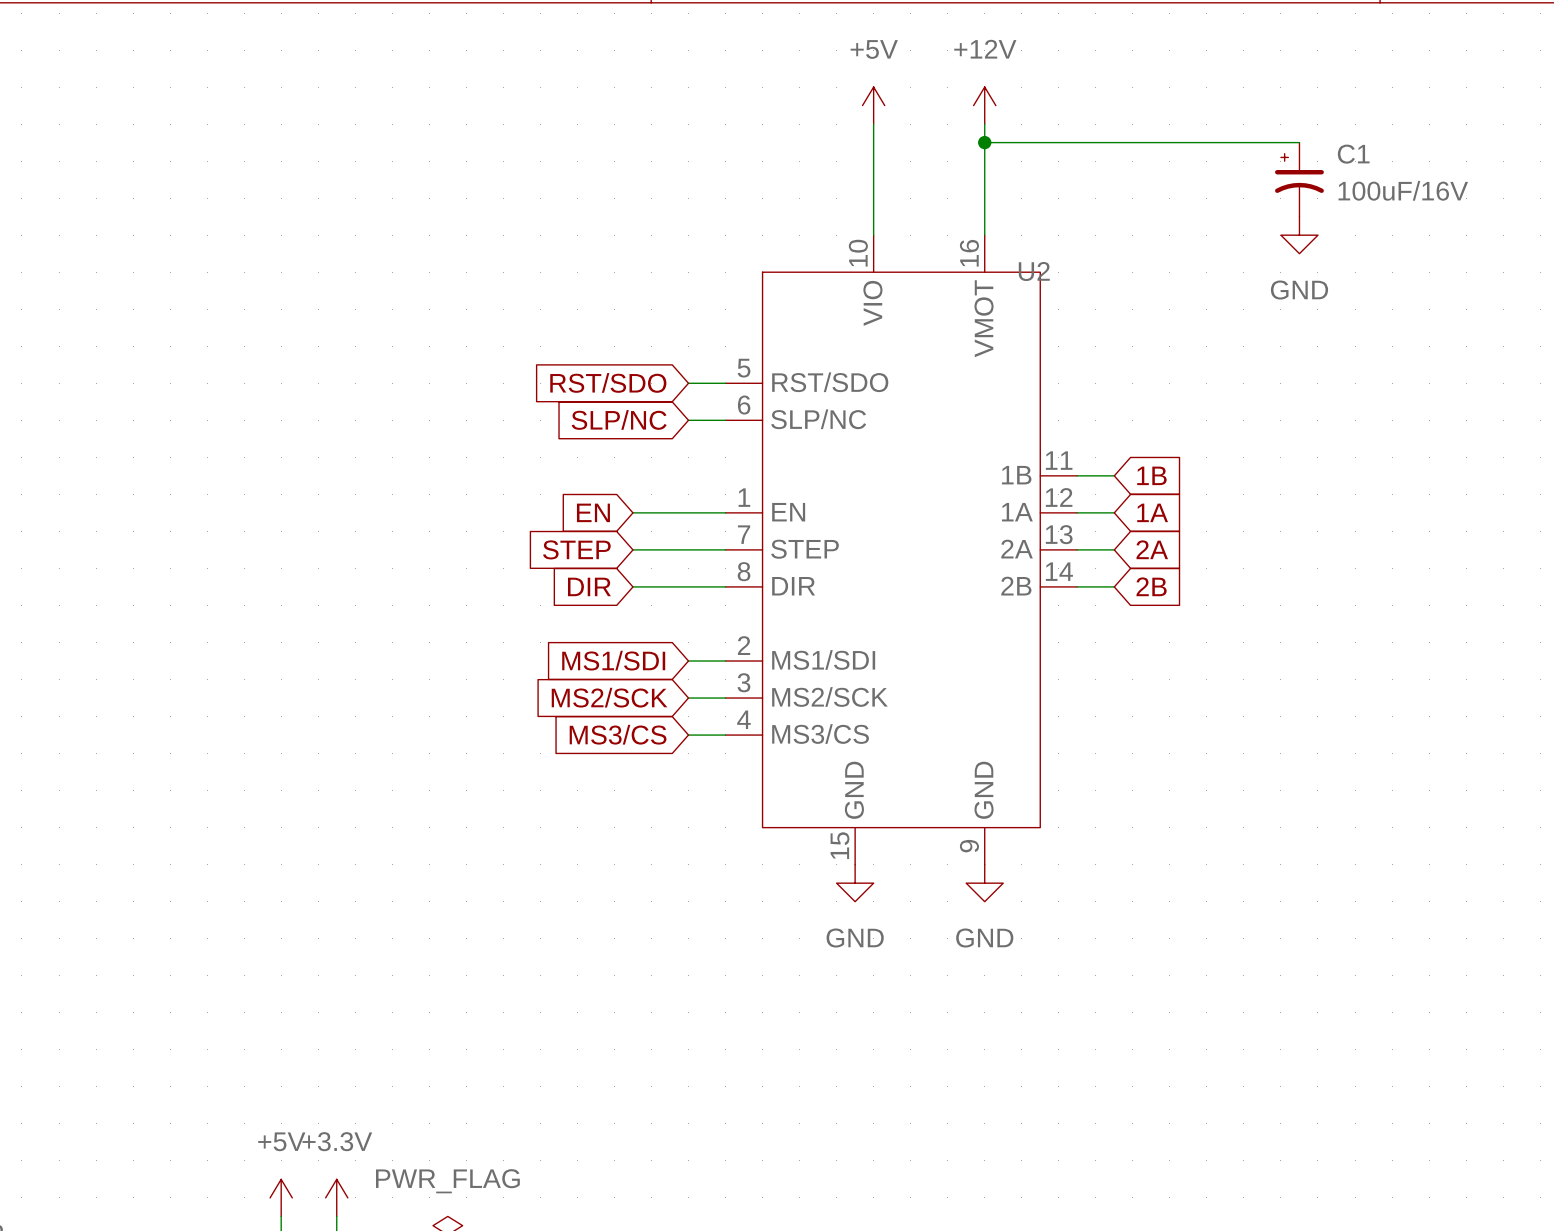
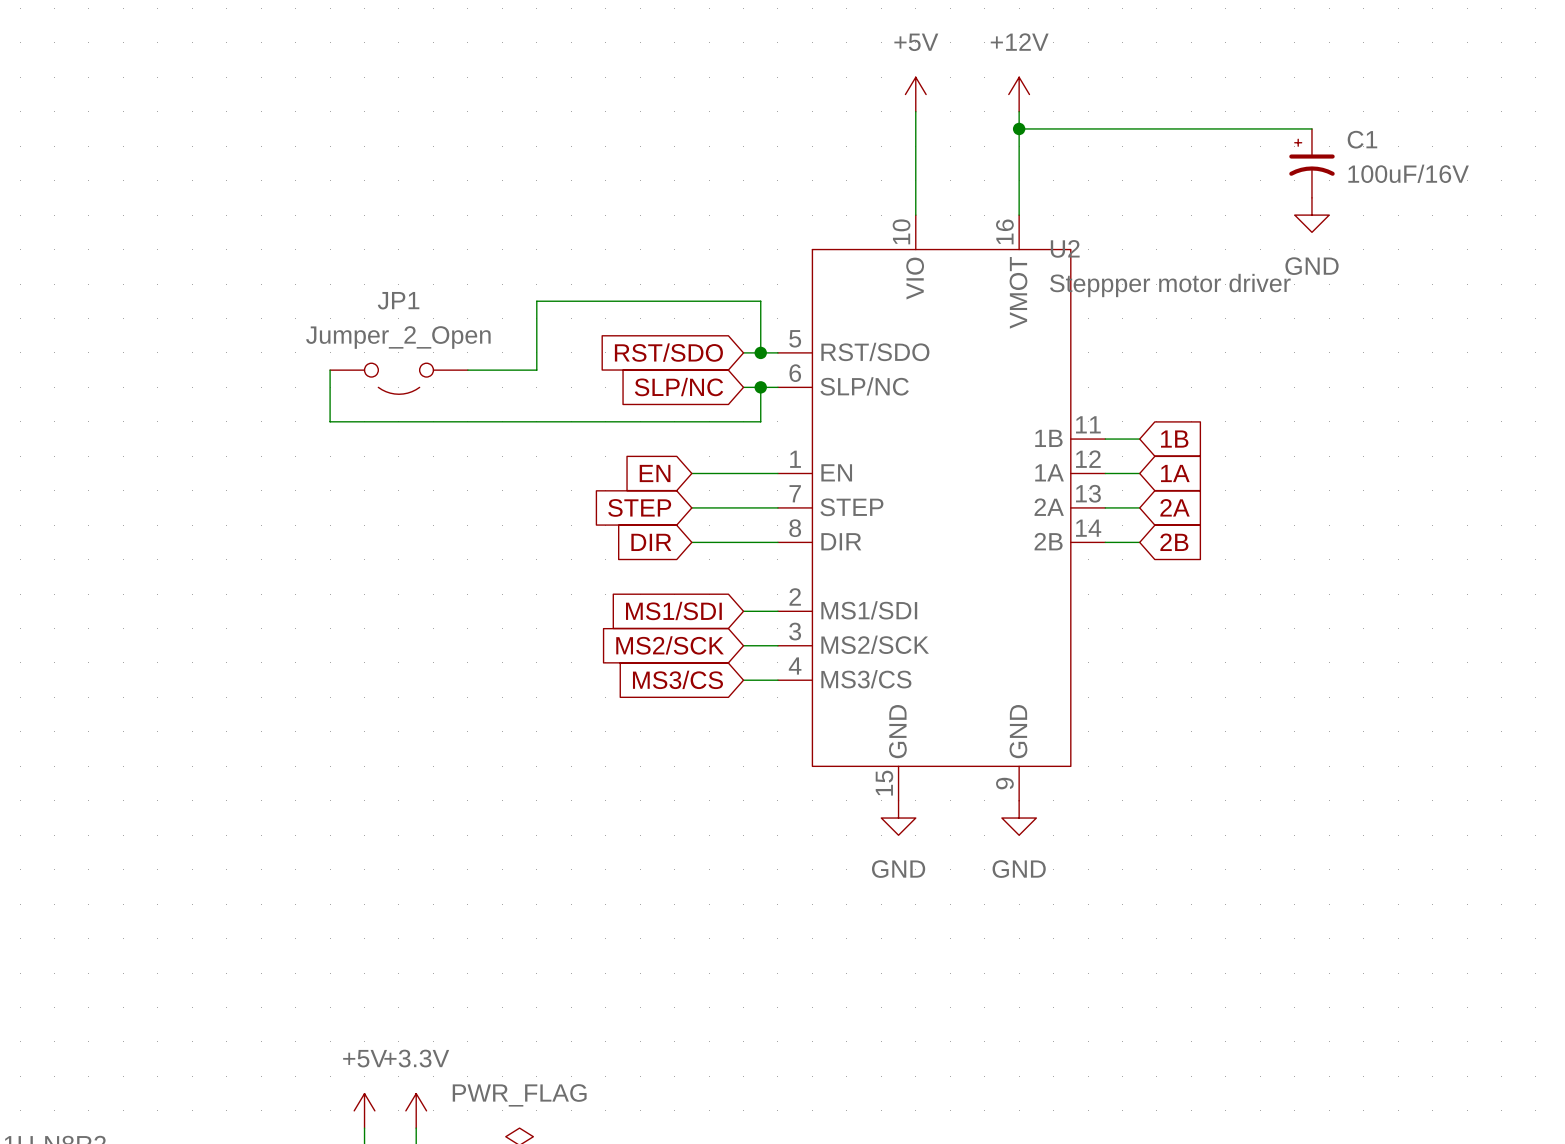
U2 value: none -> Steppper motor driver (1170, 285)
wire: none -> (760, 352) (760, 301) (536, 301) (536, 370) (467, 370)
junction: none -> (760, 352)
wire: none -> (330, 370) (330, 421) (760, 421) (760, 387)
JP1: none -> Jumper_2_Open (398, 378)
junction: none -> (760, 387)

